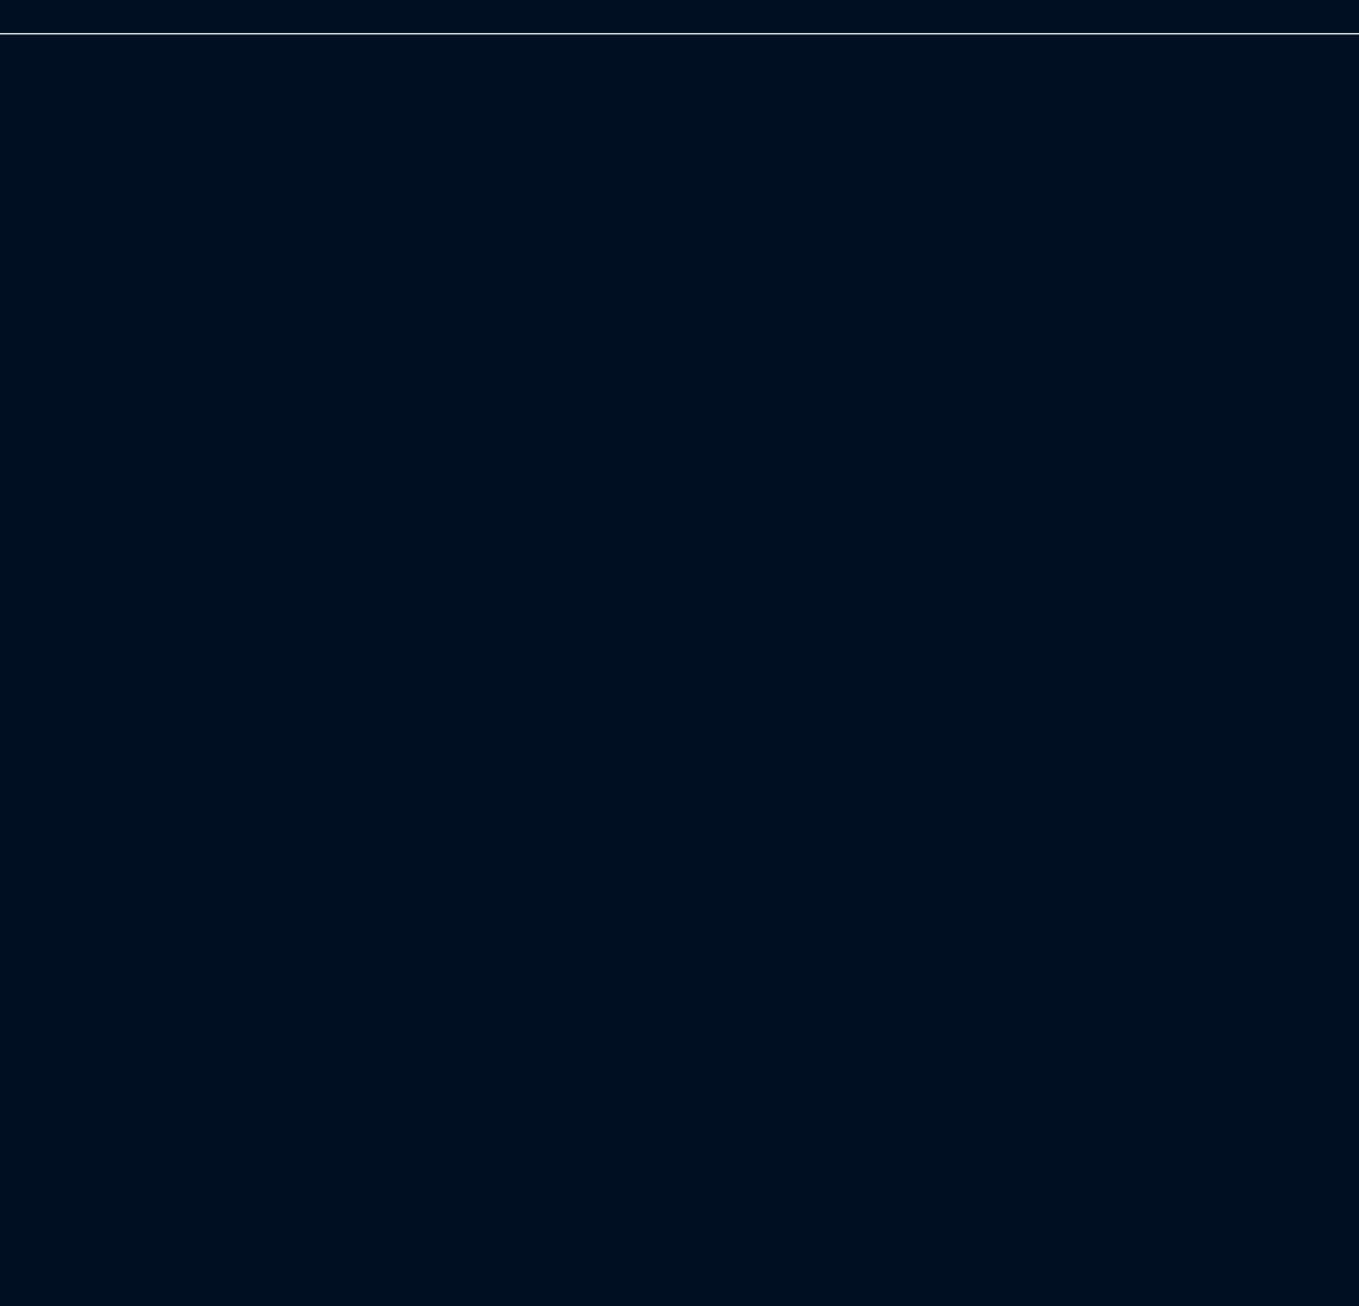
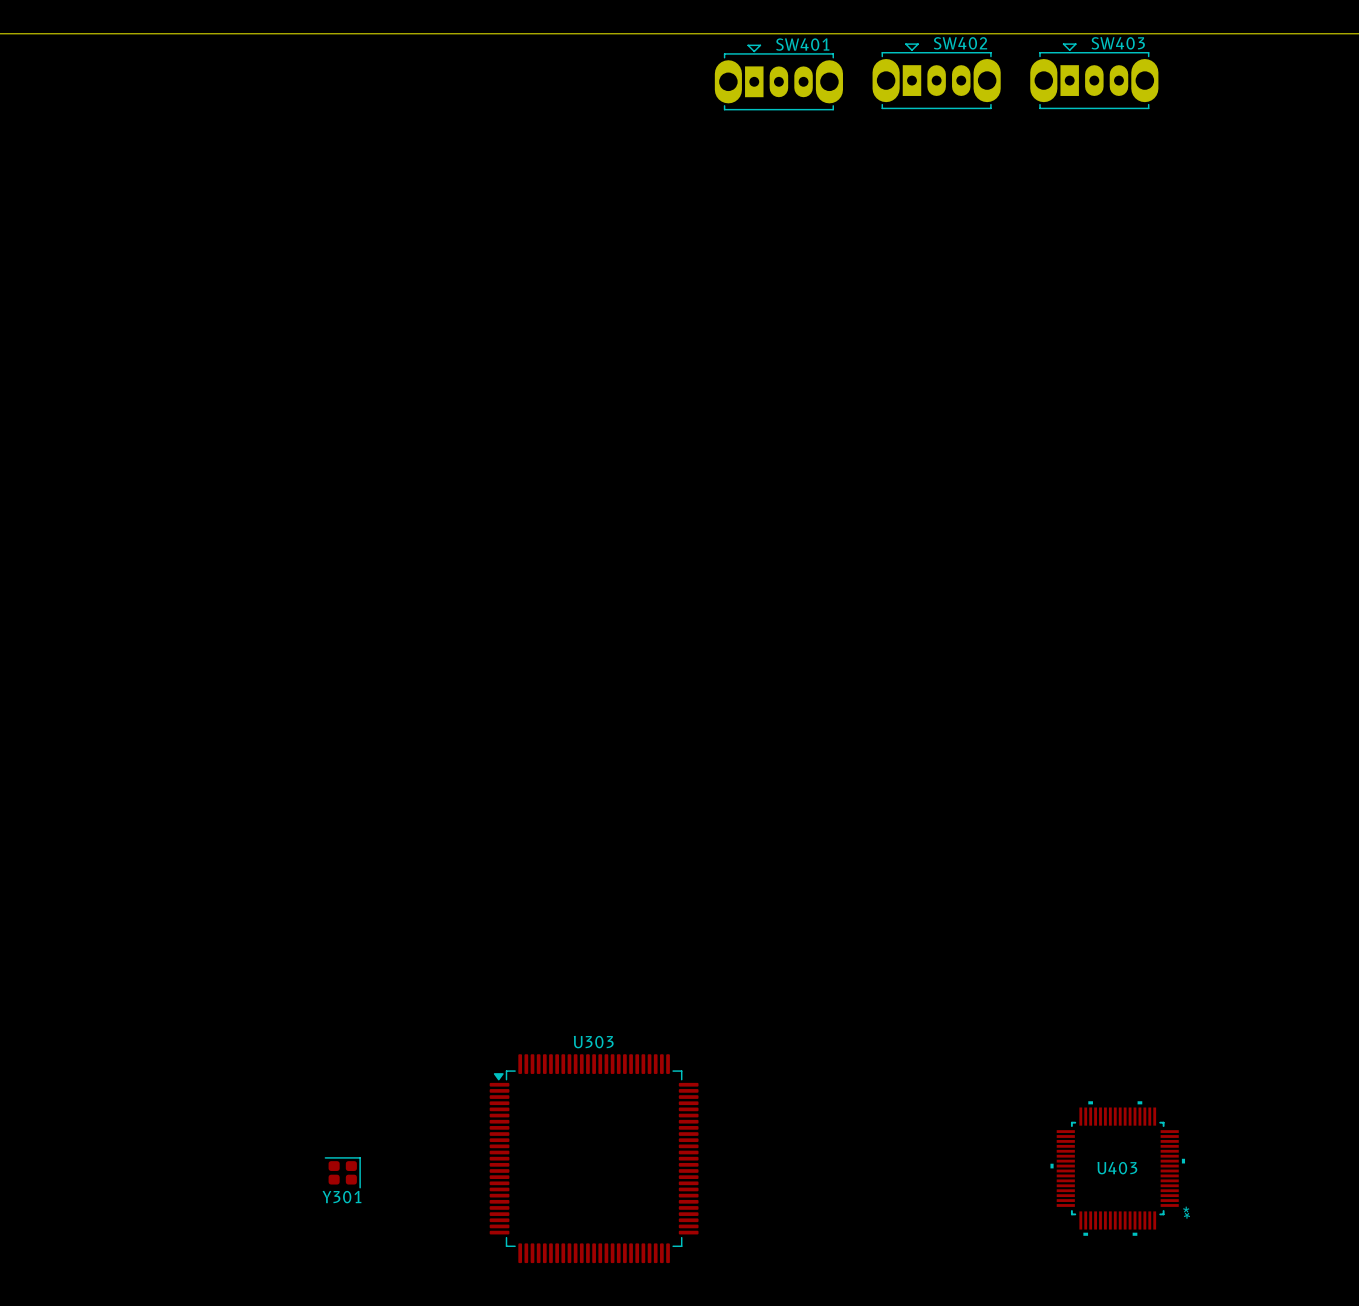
SW402: none -> (936, 76)
SW403: none -> (1094, 76)
SW401: none -> (778, 77)
U303: none -> (594, 1158)
U403: none -> (1117, 1168)
Y301: none -> (342, 1172)

